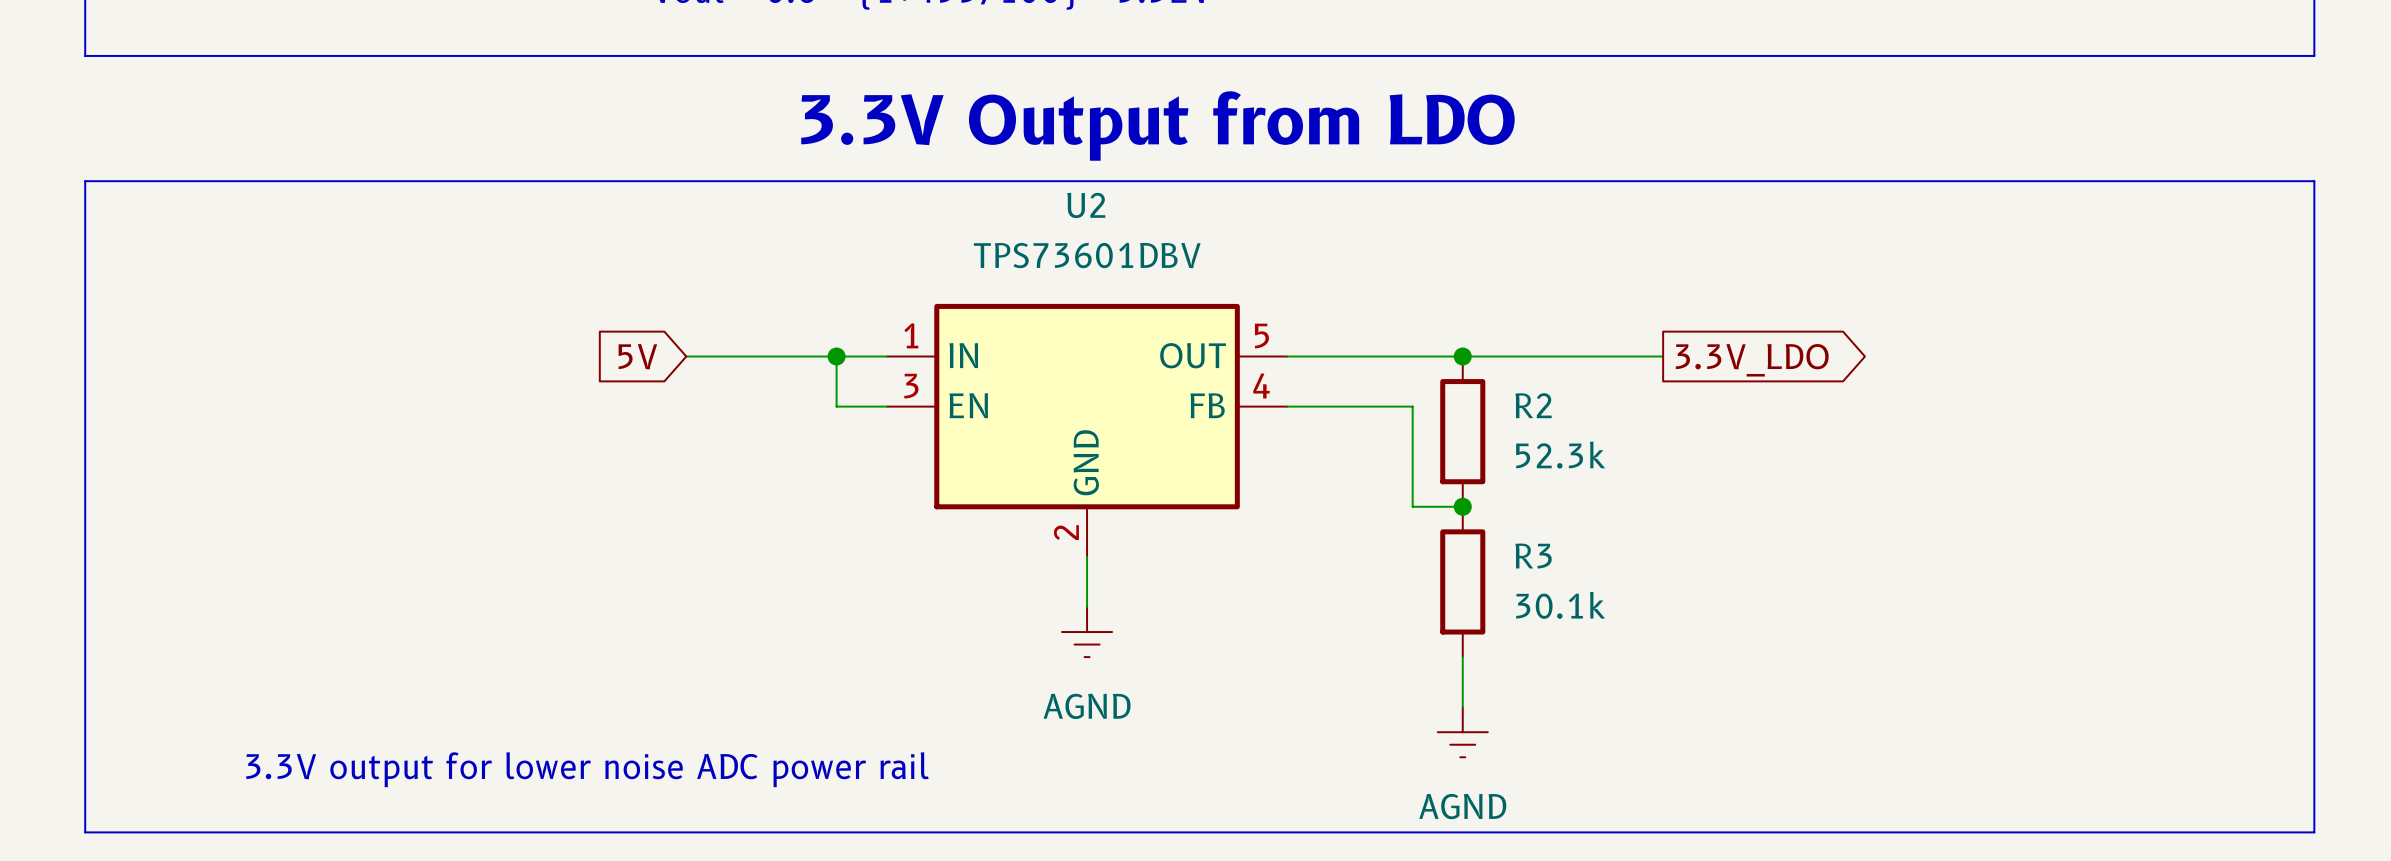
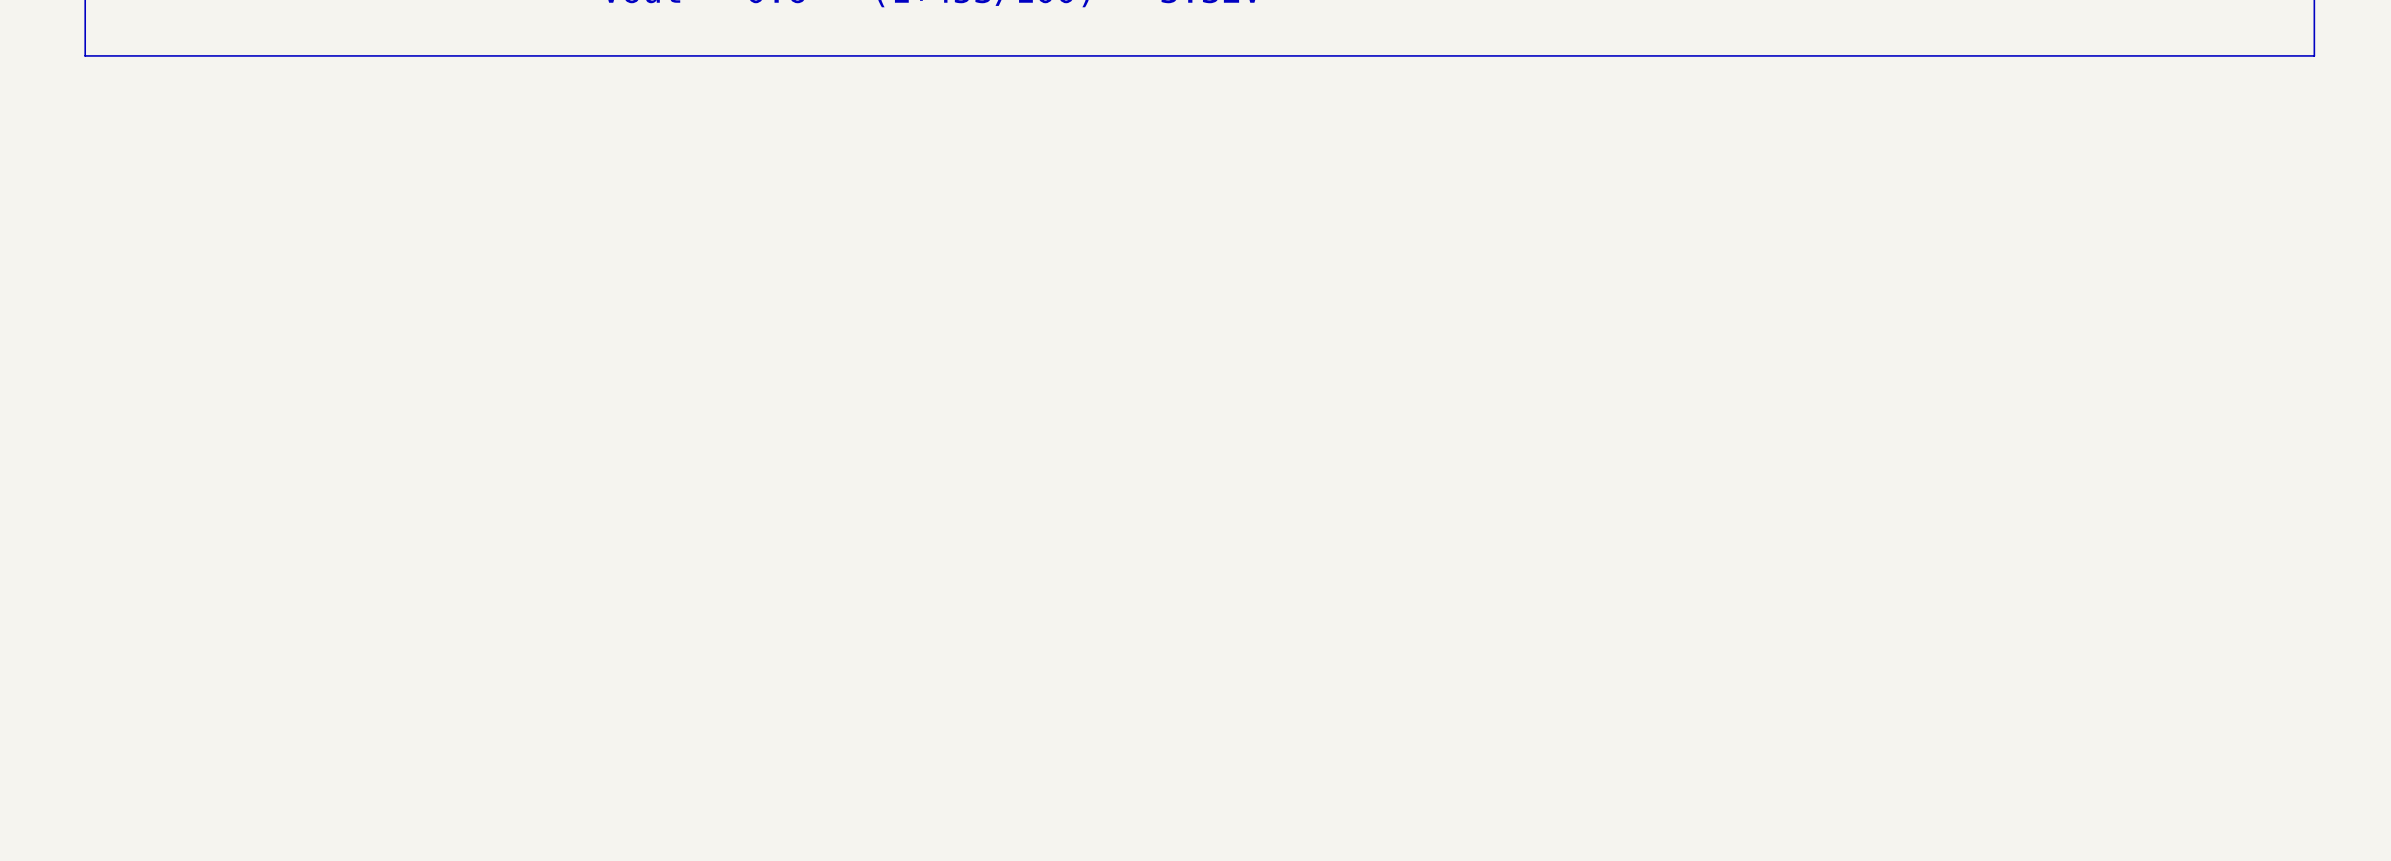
text: 3.3V Output from LDO (1157, 126) -> none
line: (85, 181) (85, 832) (2314, 832) (2314, 181) (85, 181) -> none
global label: 5V (637, 356) -> none
wire: (686, 356) (886, 356) -> none
wire: (836, 356) (836, 406) (886, 406) -> none
junction: (836, 356) -> none
wire: (1287, 356) (1663, 356) -> none
junction: (1462, 356) -> none
global label: 3.3V_LDO (1752, 360) -> none
wire: (1287, 406) (1412, 406) (1412, 506) (1462, 506) -> none
U2: TPS73601DBV (1087, 430) -> none
R2: 52.3k (1462, 431) -> none
junction: (1462, 506) -> none
wire: (1087, 556) (1087, 606) -> none
R3: 30.1k (1462, 581) -> none
power symbol: AGND (1087, 632) -> none
wire: (1462, 657) (1462, 707) -> none
power symbol: AGND (1462, 732) -> none
text: 3.3V output for lower noise ADC power rail (587, 769) -> none

